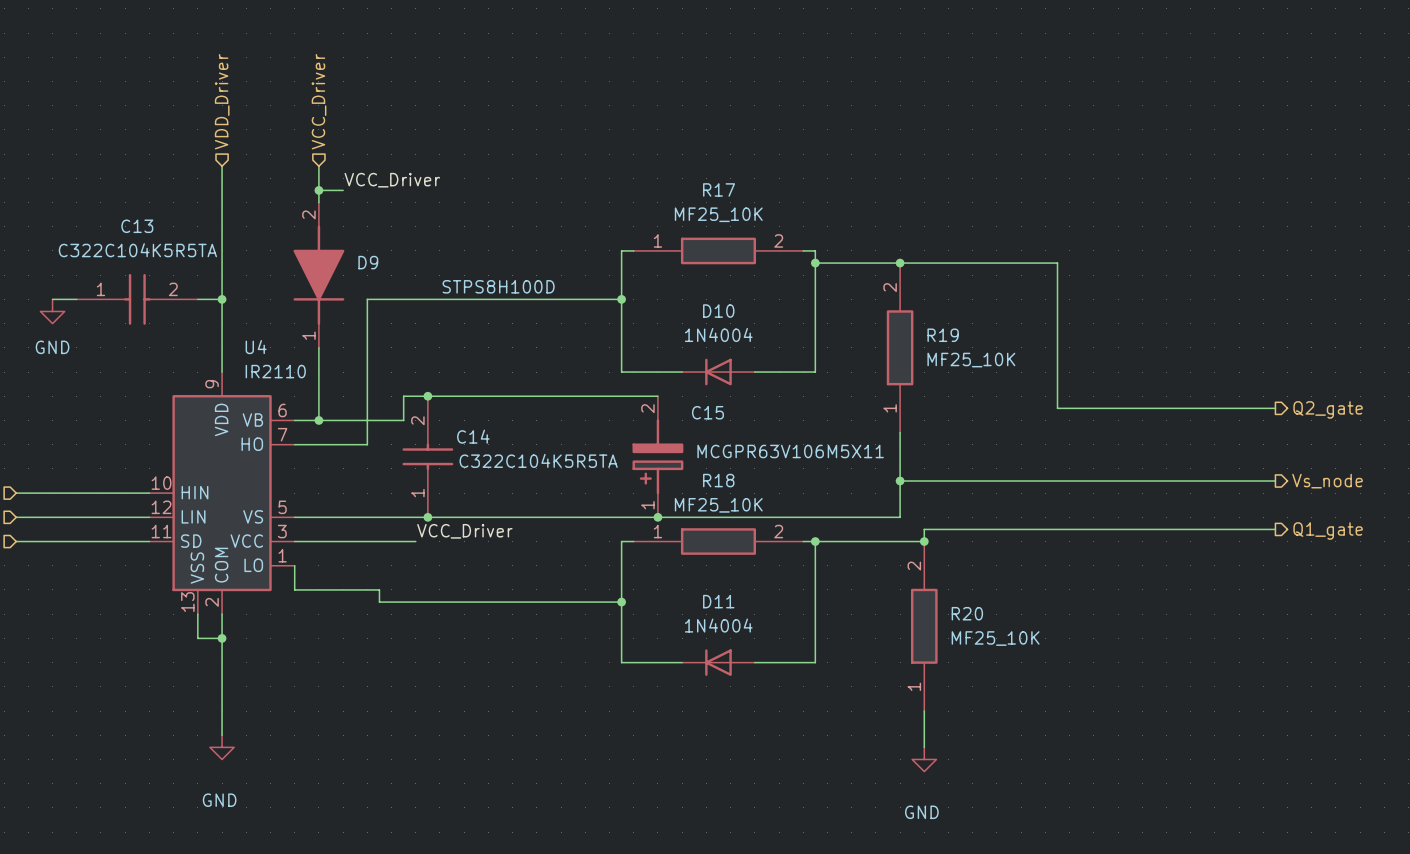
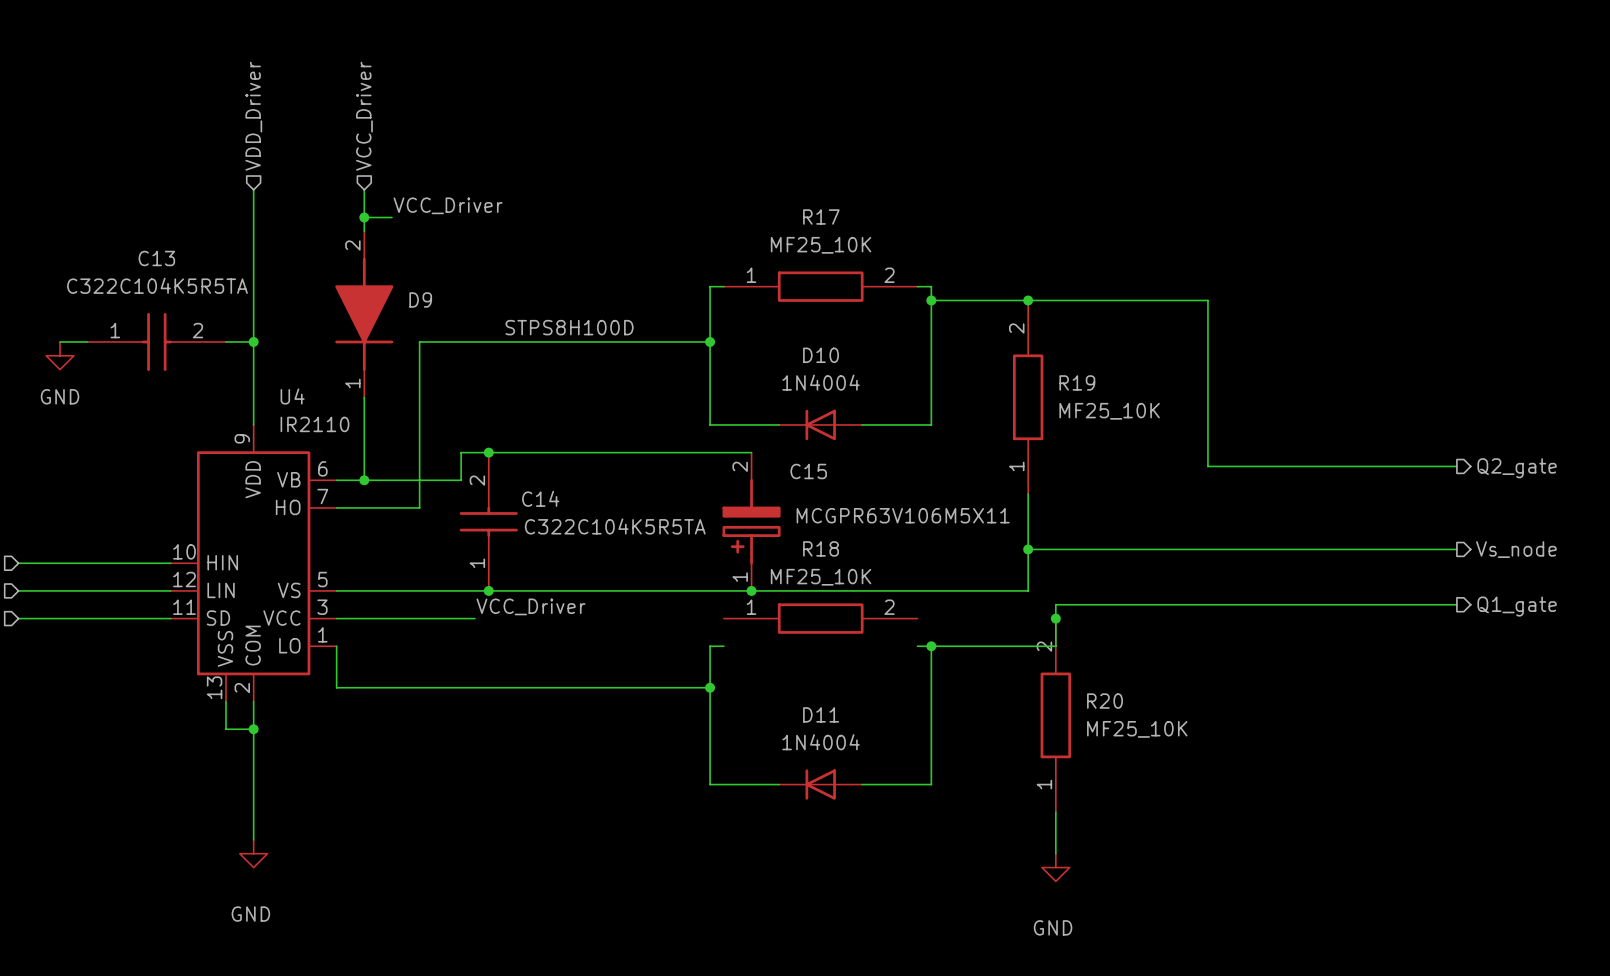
wire: (633, 541) (621, 541) (621, 565) -> (723, 646) (710, 646)
wire: (803, 541) (924, 541) -> (917, 646) (1055, 646) (1055, 618)
wire: (815, 541) (815, 565) -> none
junction position: (815, 541) -> (931, 646)
wire: (294, 589) (379, 589) (379, 602) -> (336, 673) (336, 687) (433, 687)
wire: (621, 662) (682, 662) -> (710, 756) (710, 784) (779, 784)
D11 position: (718, 662) -> (820, 784)
wire: (754, 662) (815, 662) -> (862, 784) (931, 784) (931, 756)

